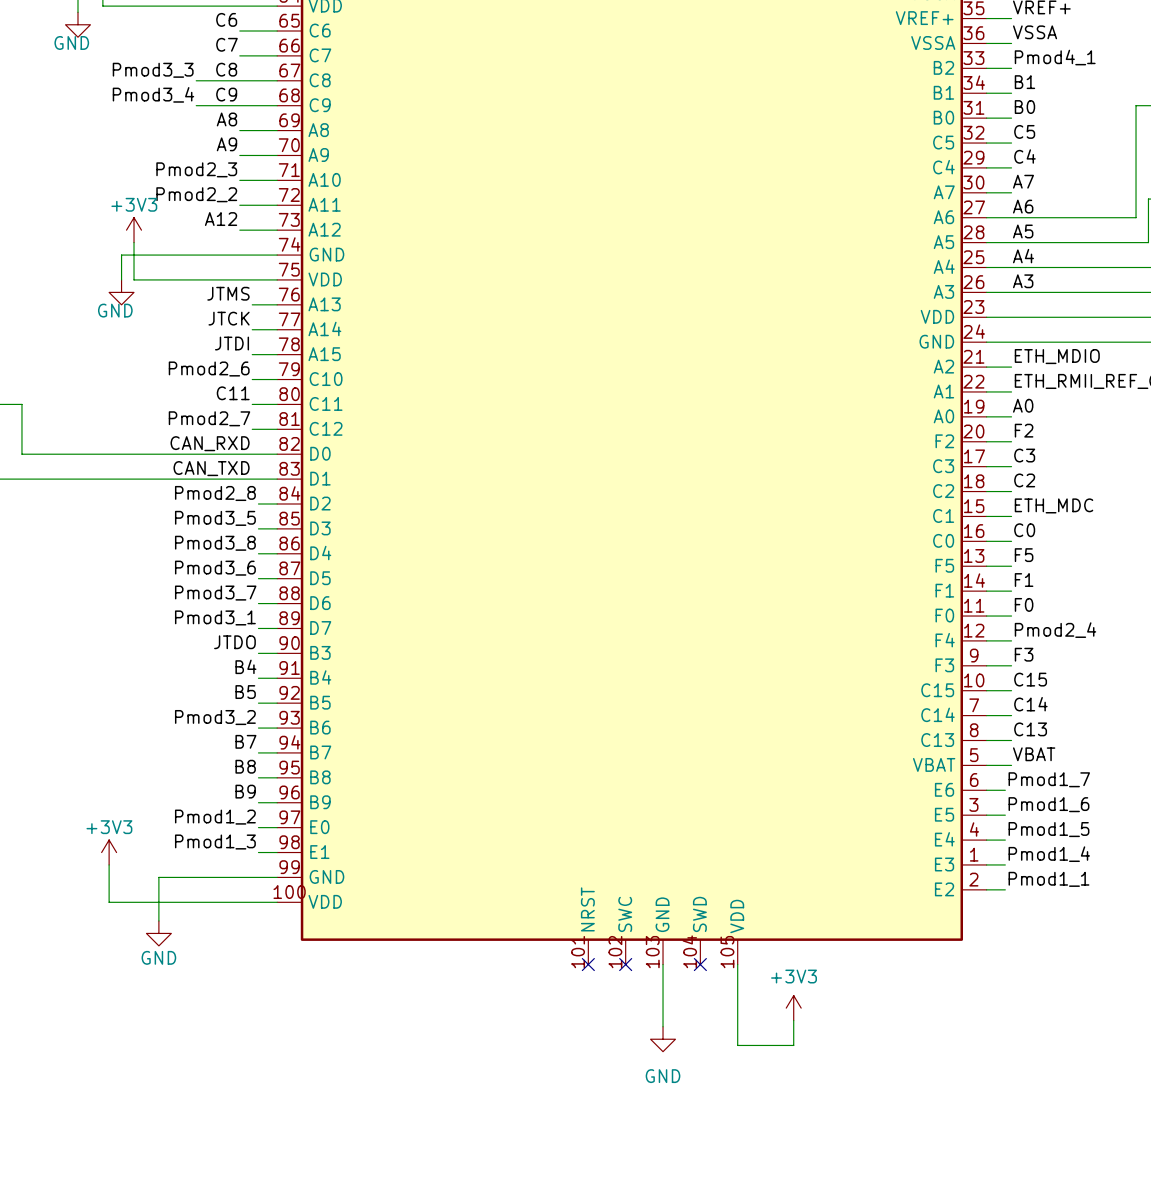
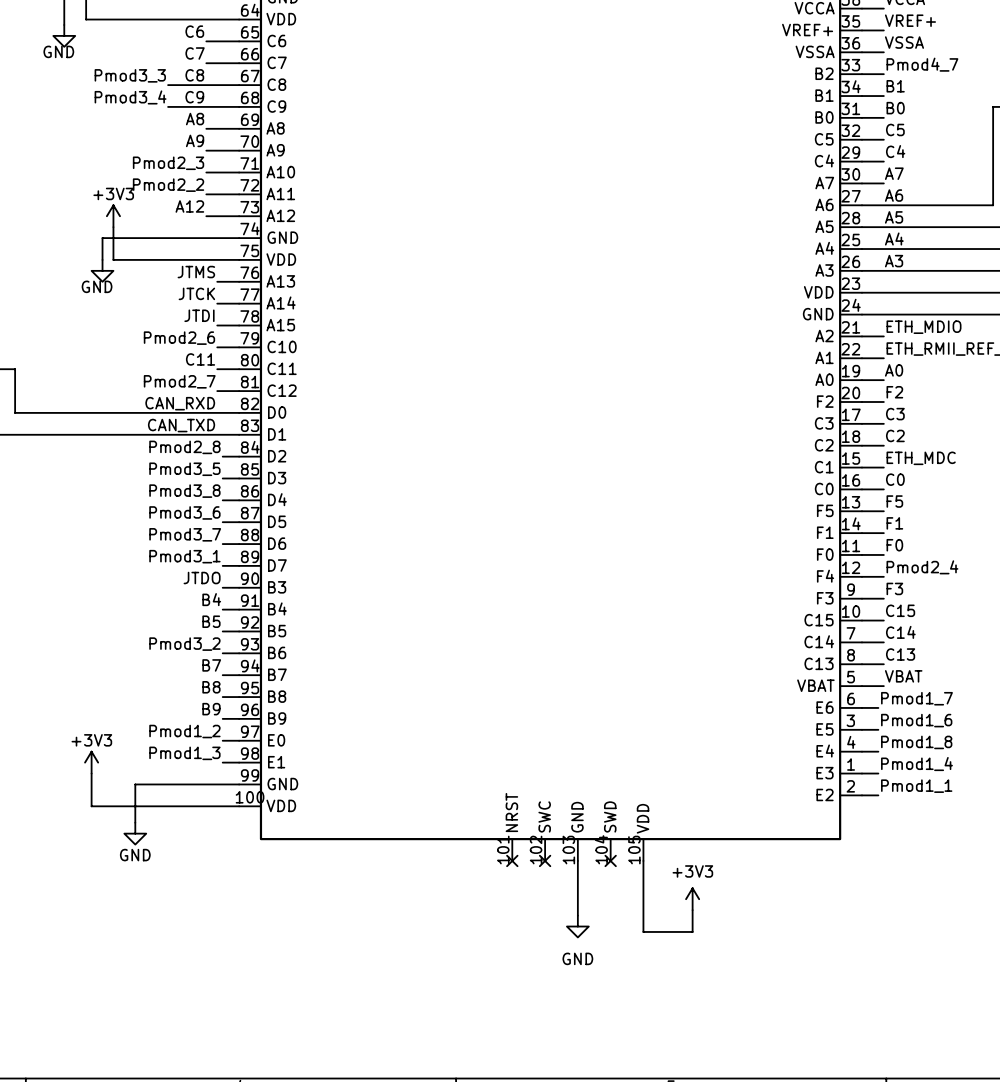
label: Pmod4_1 (1055, 57) -> Pmod4_7 (922, 64)
label: Pmod1_5 (1048, 829) -> Pmod1_8 (916, 742)

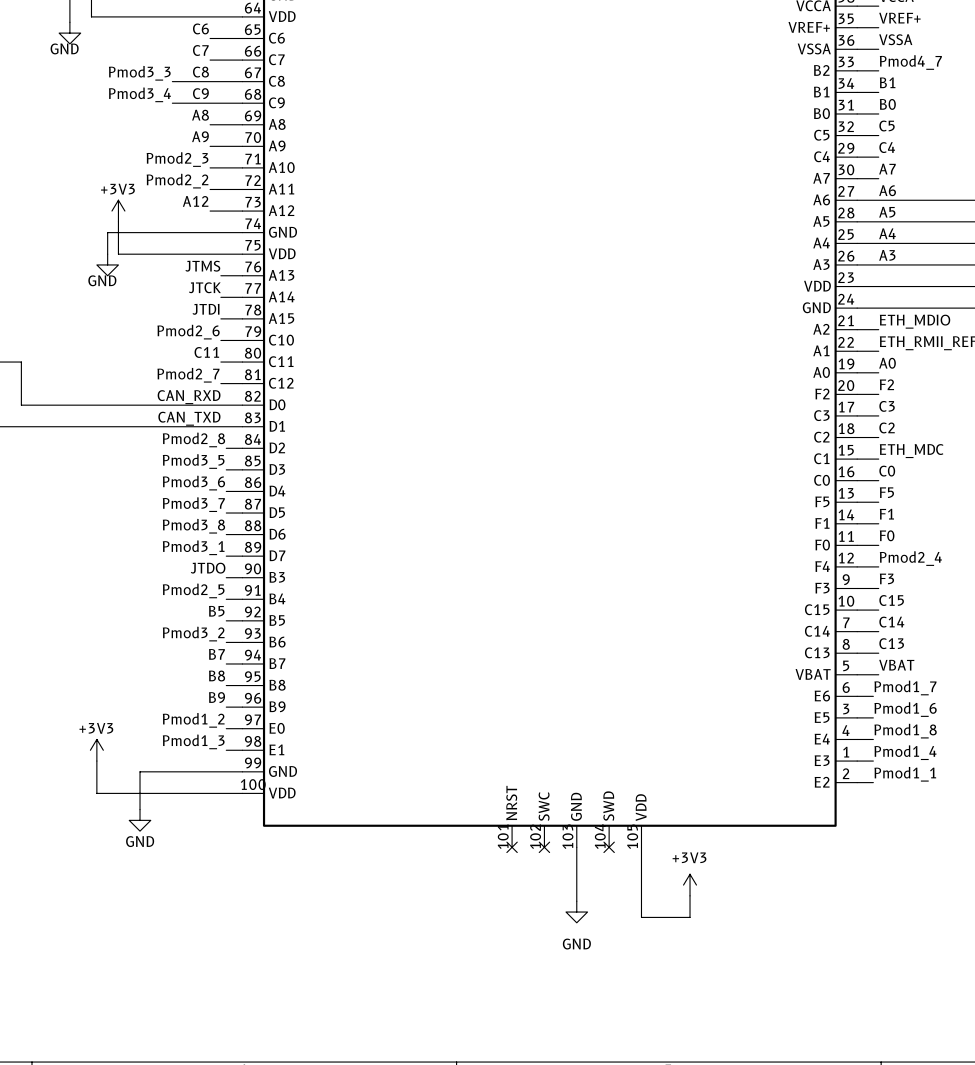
label: Pmod3_8 (184, 491) -> Pmod3_6 (193, 483)
label: Pmod3_6 (184, 512) -> Pmod3_7 (193, 504)
label: Pmod3_7 (185, 534) -> Pmod3_8 (193, 526)
label: B4 (211, 599) -> Pmod2_5 (193, 590)

